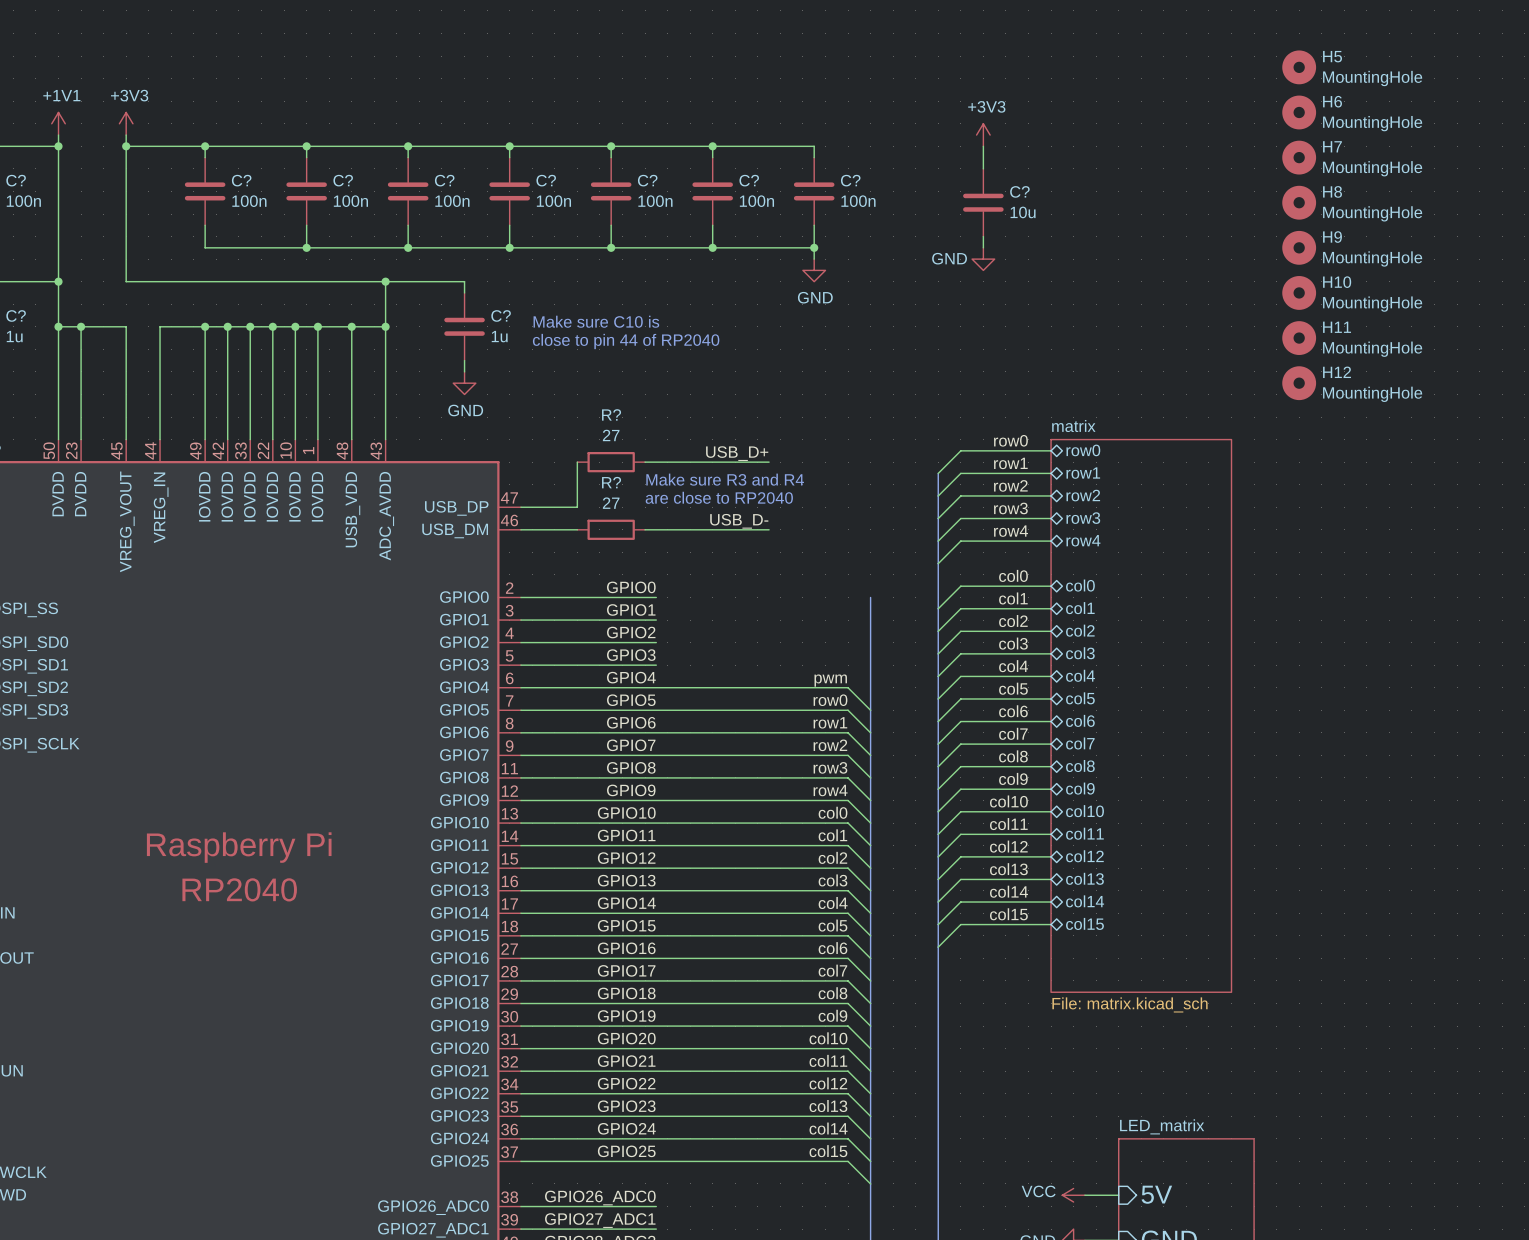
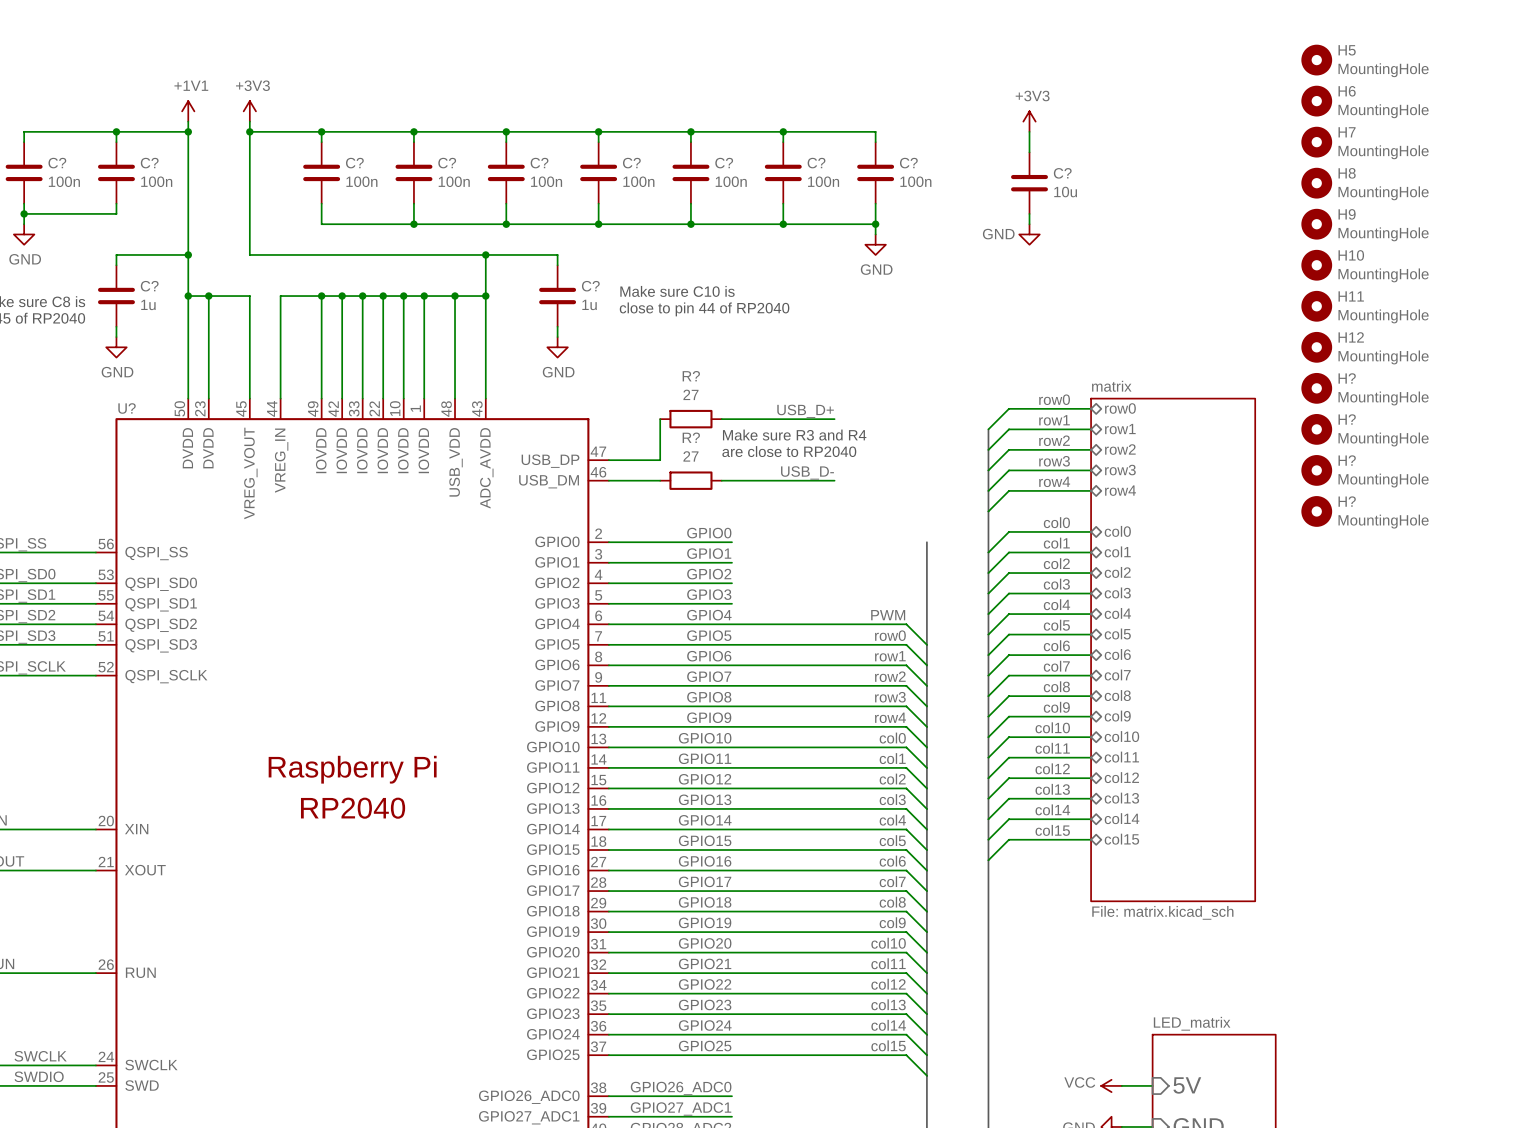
H?: none -> MountingHole (1316, 388)
H?: none -> MountingHole (1316, 429)
H?: none -> MountingHole (1316, 470)
H?: none -> MountingHole (1316, 511)
label: pwm (830, 680) -> PWM (888, 615)

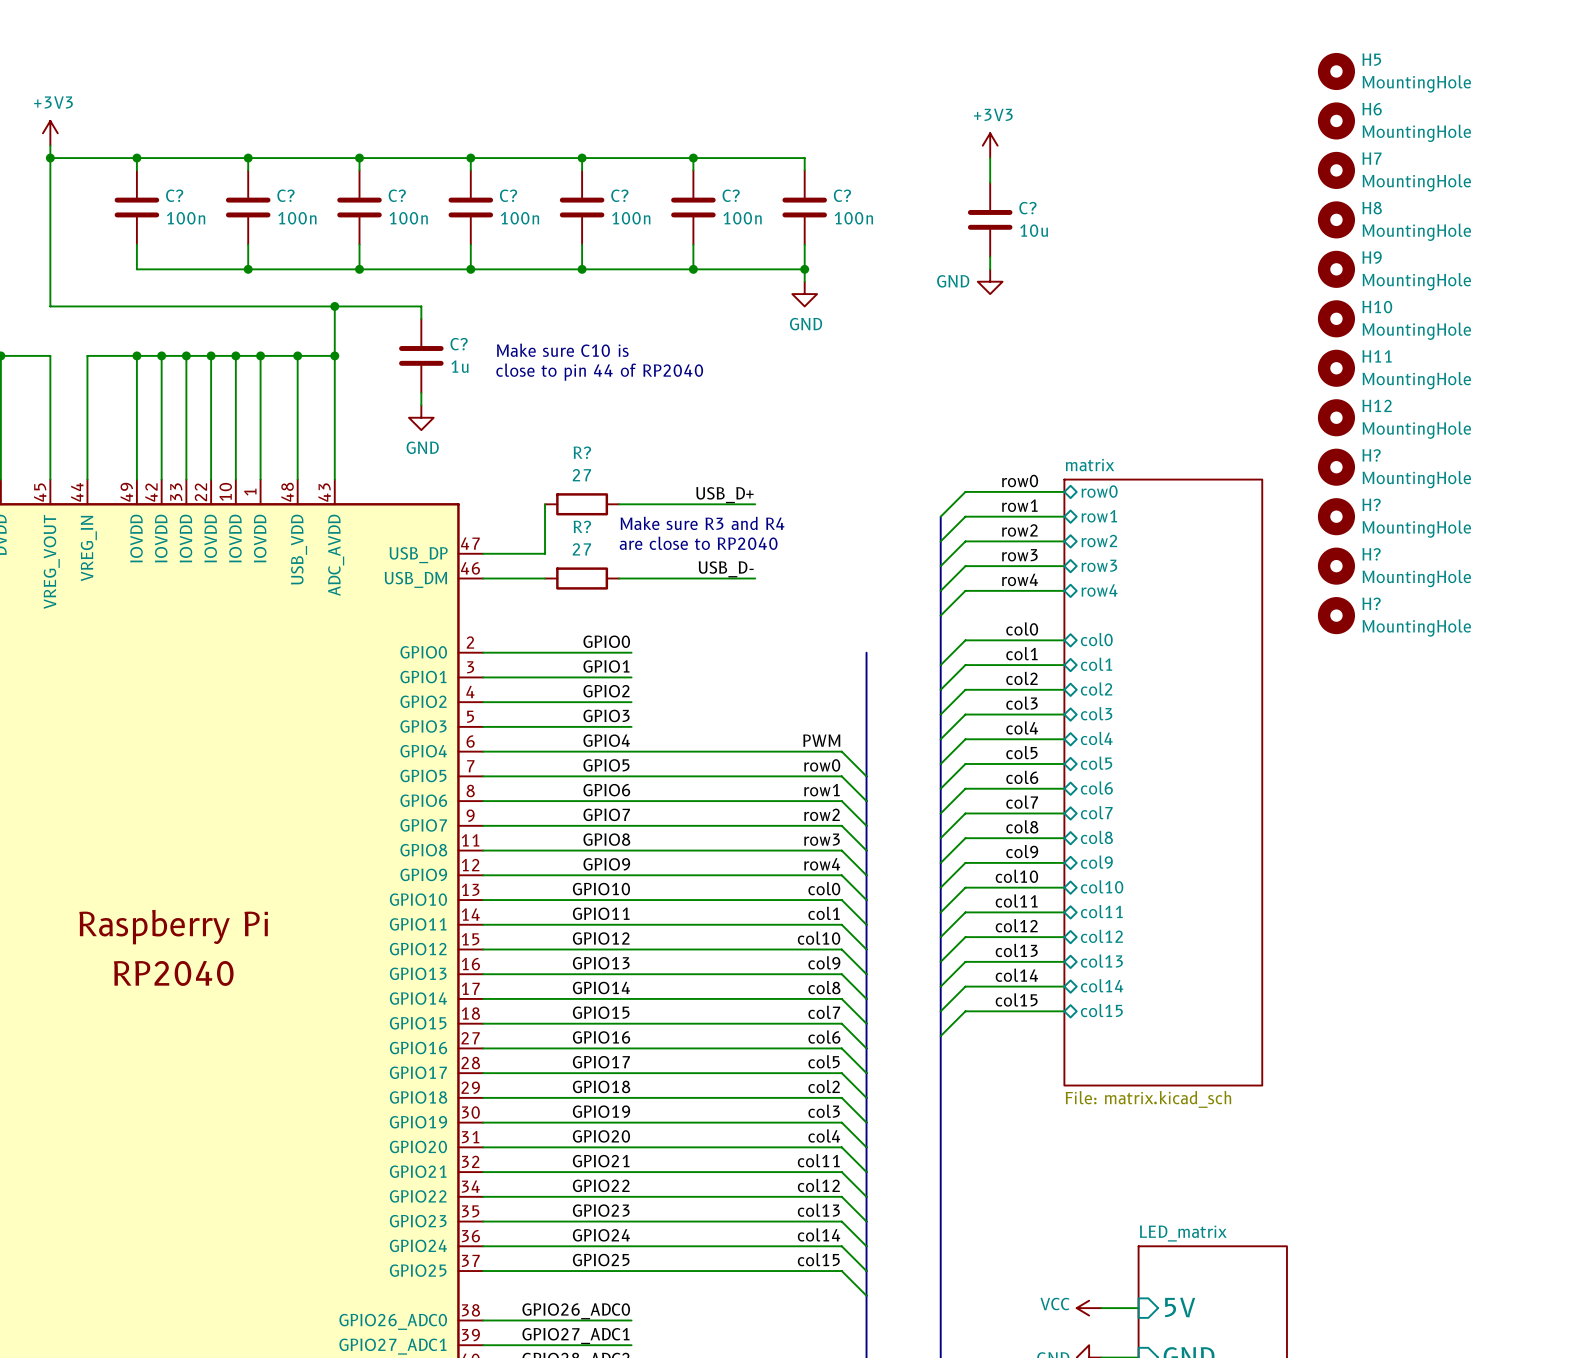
label: col2 (892, 779) -> col10 (819, 938)
label: col3 (892, 799) -> col9 (824, 962)
label: col4 (892, 820) -> col8 (824, 987)
label: col5 (892, 840) -> col7 (824, 1012)
label: col7 (892, 881) -> col5 (824, 1061)
label: col8 (892, 902) -> col2 (824, 1086)
label: col9 (892, 922) -> col3 (824, 1111)
label: col10 (888, 943) -> col4 (824, 1135)

